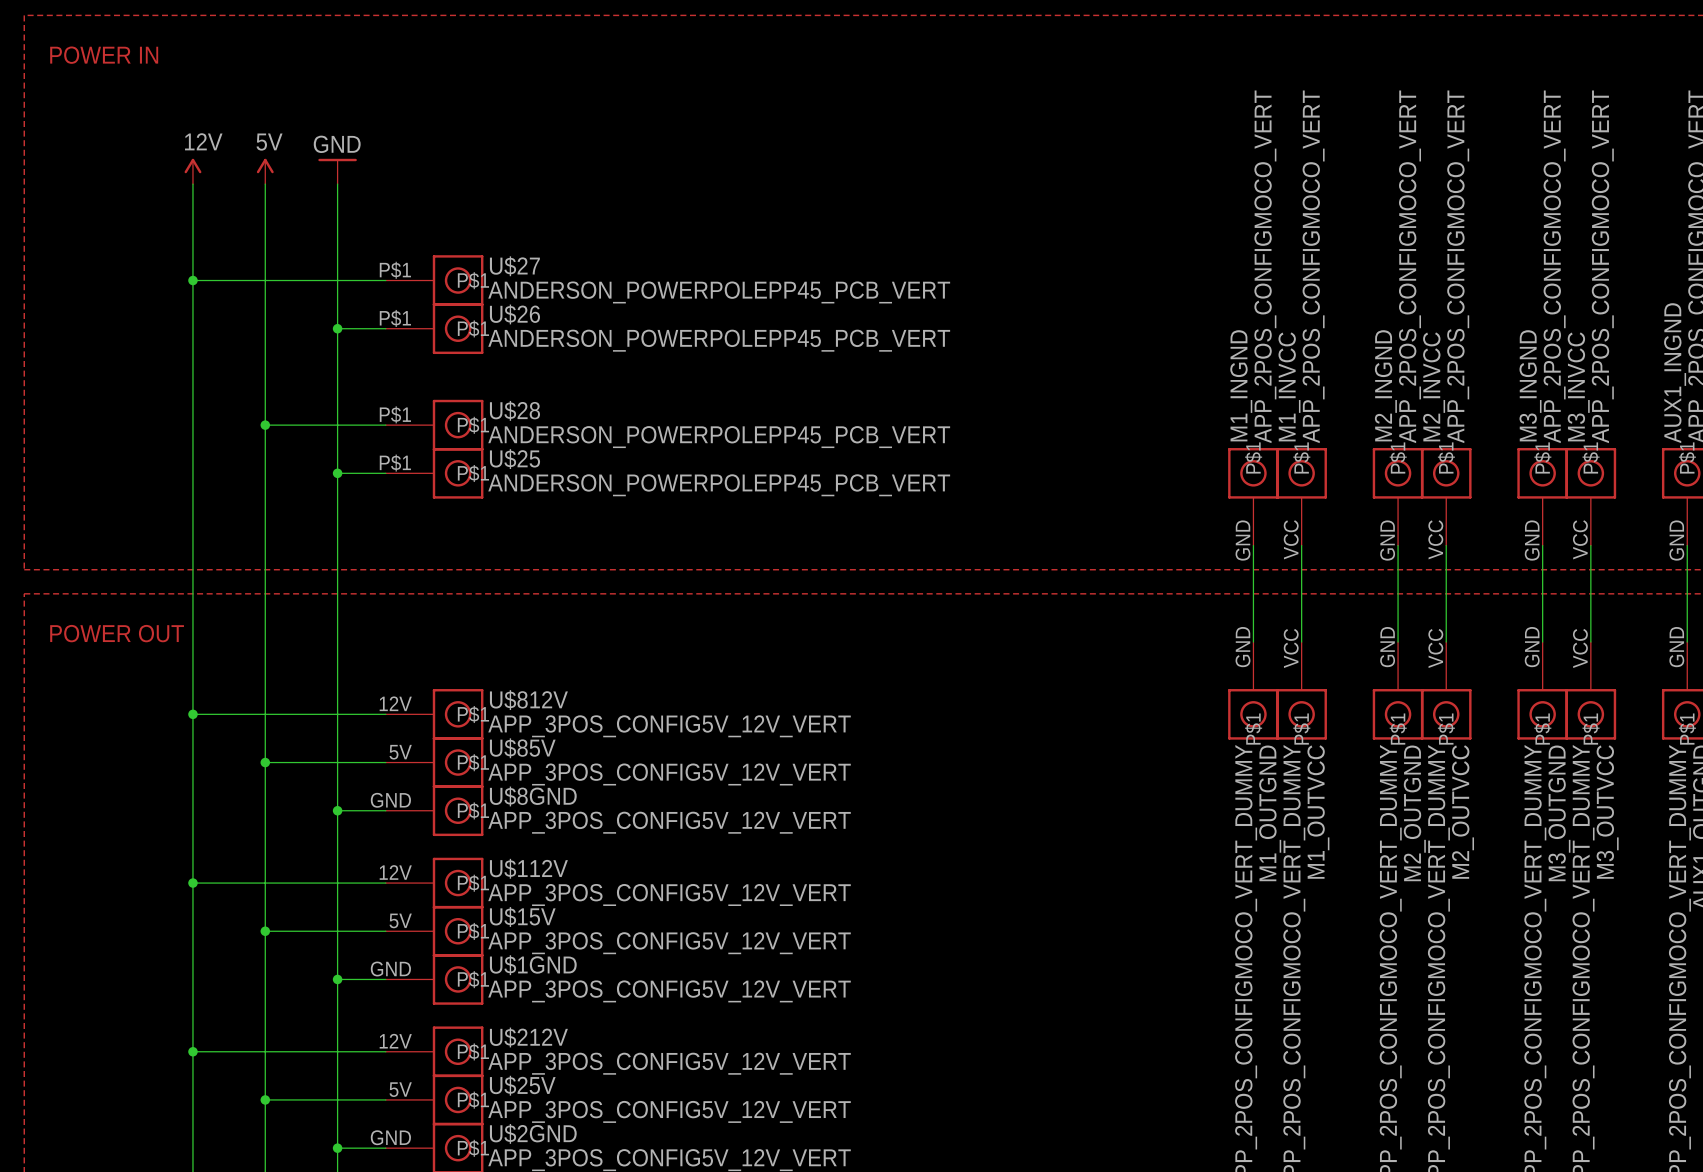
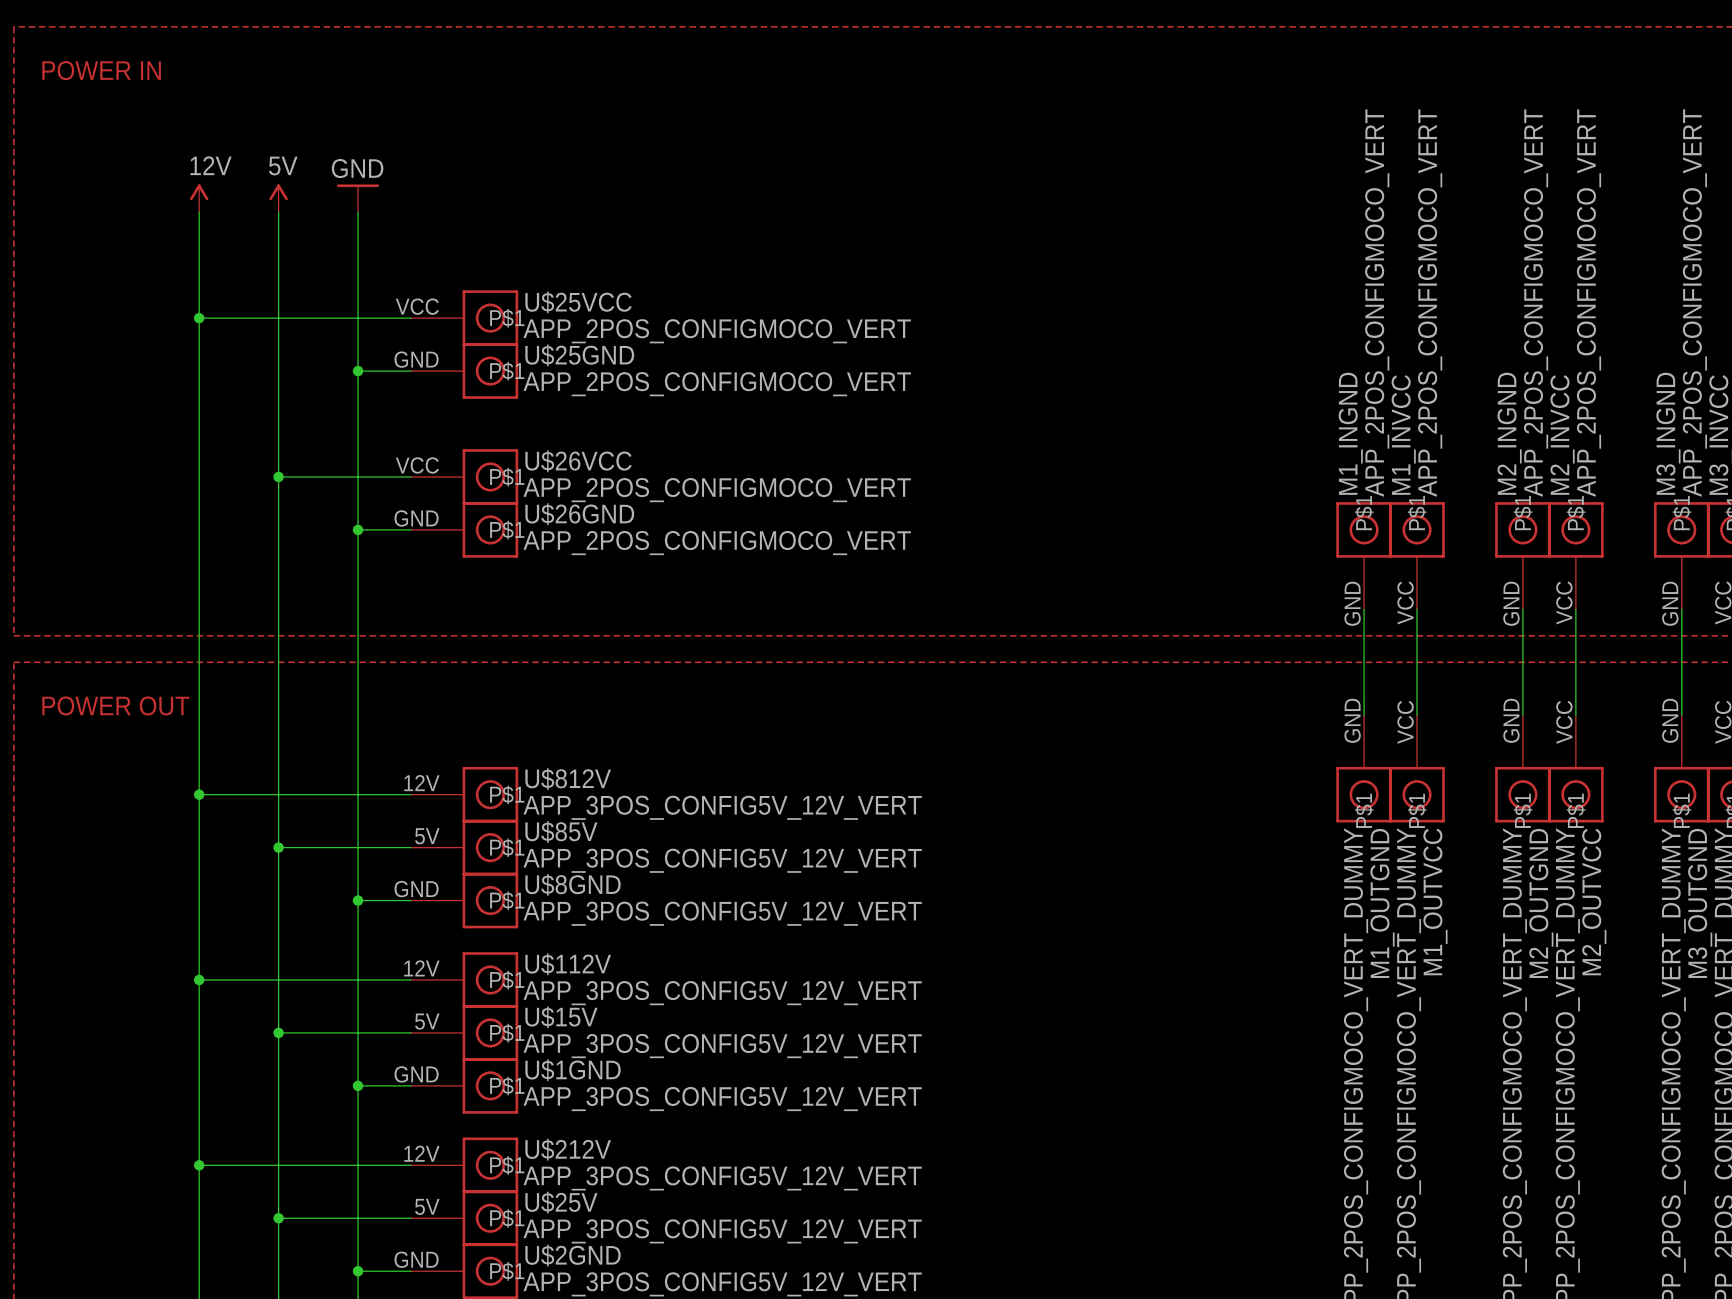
U$27 name: U$27 (514, 266) -> U$25VCC (578, 302)
U$27 pin number: P$1 (395, 270) -> VCC (417, 306)
U$27 value: ANDERSON_POWERPOLEPP45_PCB_VERT (719, 292) -> APP_2POS_CONFIGMOCO_VERT (717, 331)
U$26 name: U$26 (514, 314) -> U$25GND (579, 355)
U$26 pin number: P$1 (395, 318) -> GND (416, 359)
U$26 value: ANDERSON_POWERPOLEPP45_PCB_VERT (719, 340) -> APP_2POS_CONFIGMOCO_VERT (717, 384)
U$28 name: U$28 (514, 410) -> U$26VCC (578, 461)
U$28 pin number: P$1 (395, 414) -> VCC (417, 465)
U$28 value: ANDERSON_POWERPOLEPP45_PCB_VERT (719, 437) -> APP_2POS_CONFIGMOCO_VERT (717, 490)
U$25 name: U$25 (514, 459) -> U$26GND (579, 514)
U$25 pin number: P$1 (395, 463) -> GND (416, 518)
U$25 value: ANDERSON_POWERPOLEPP45_PCB_VERT (719, 485) -> APP_2POS_CONFIGMOCO_VERT (717, 543)

